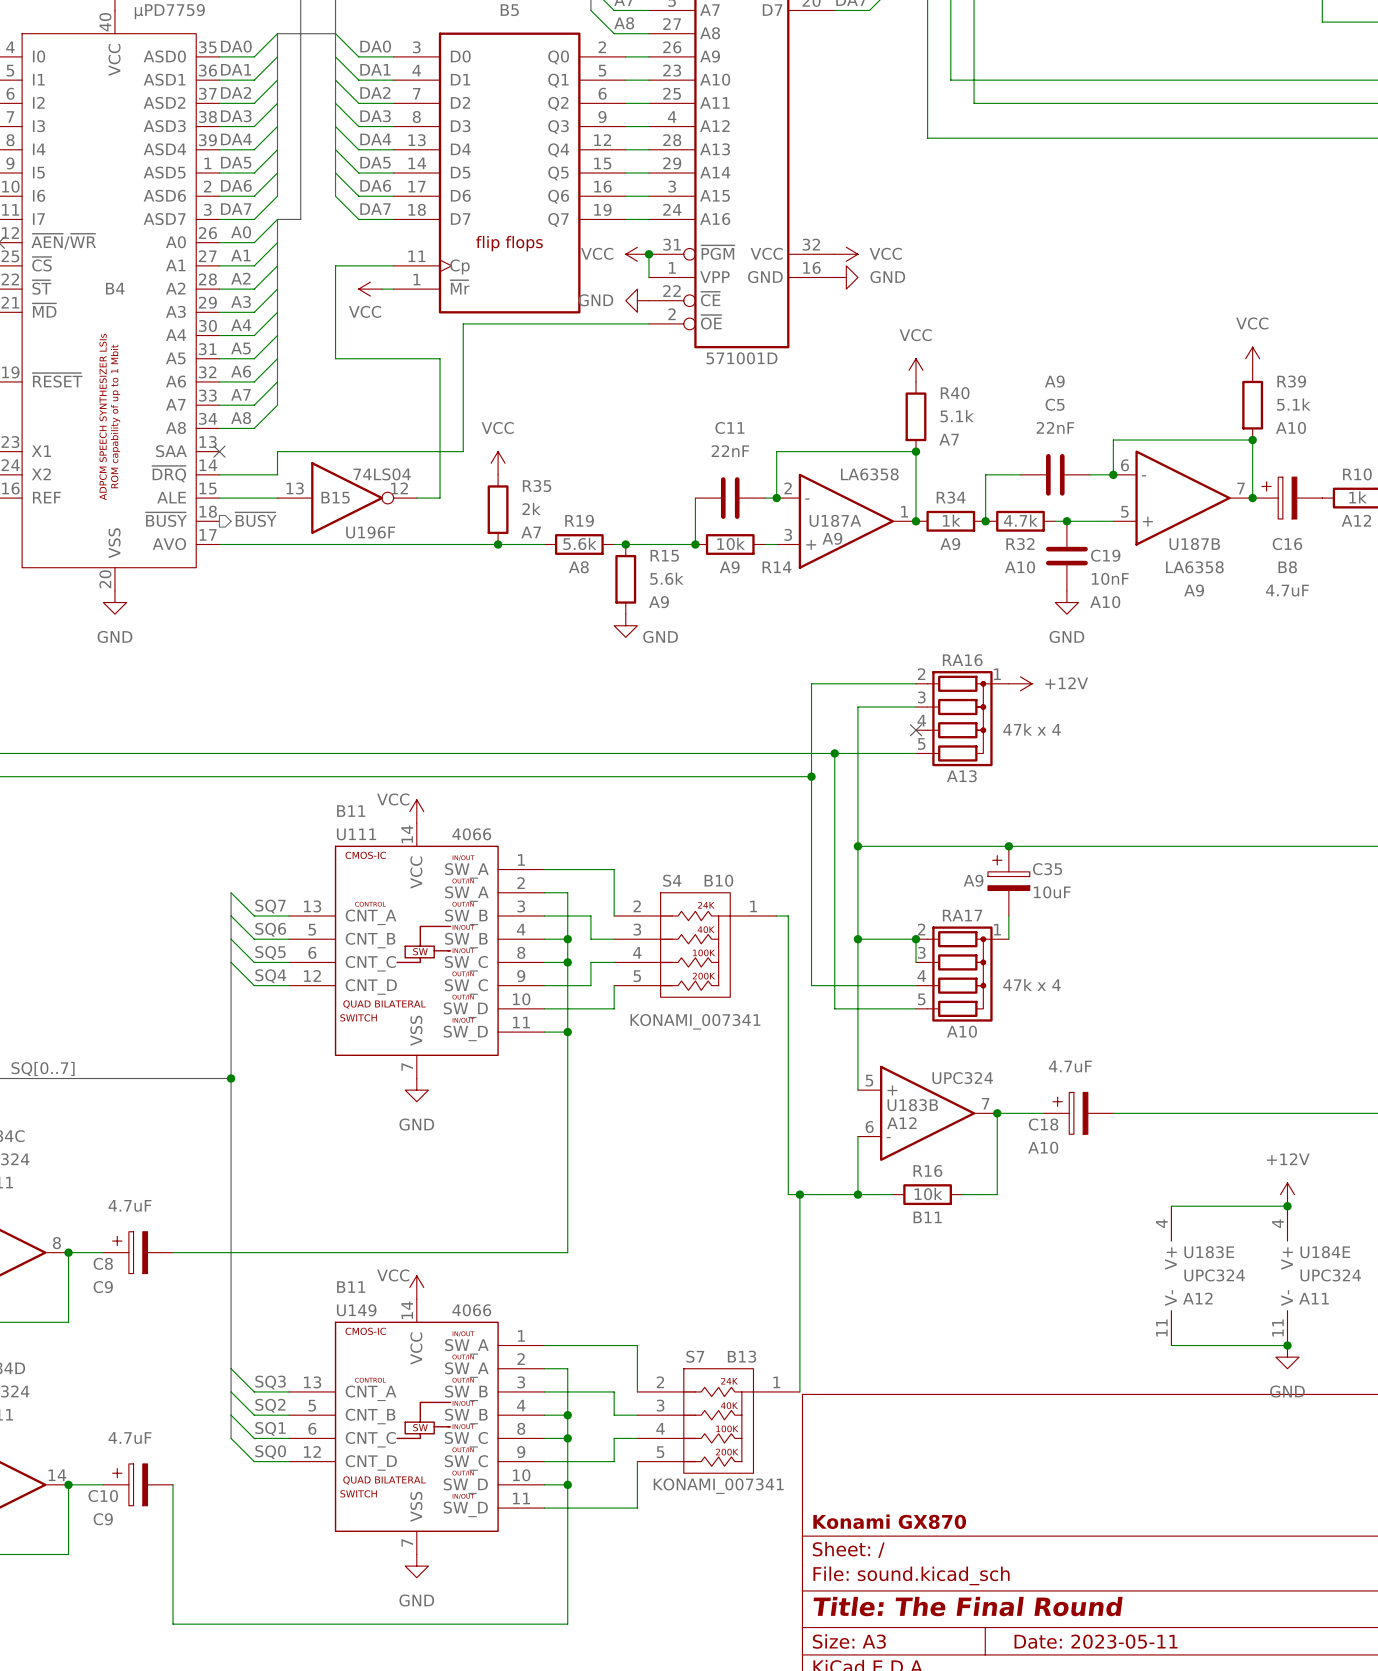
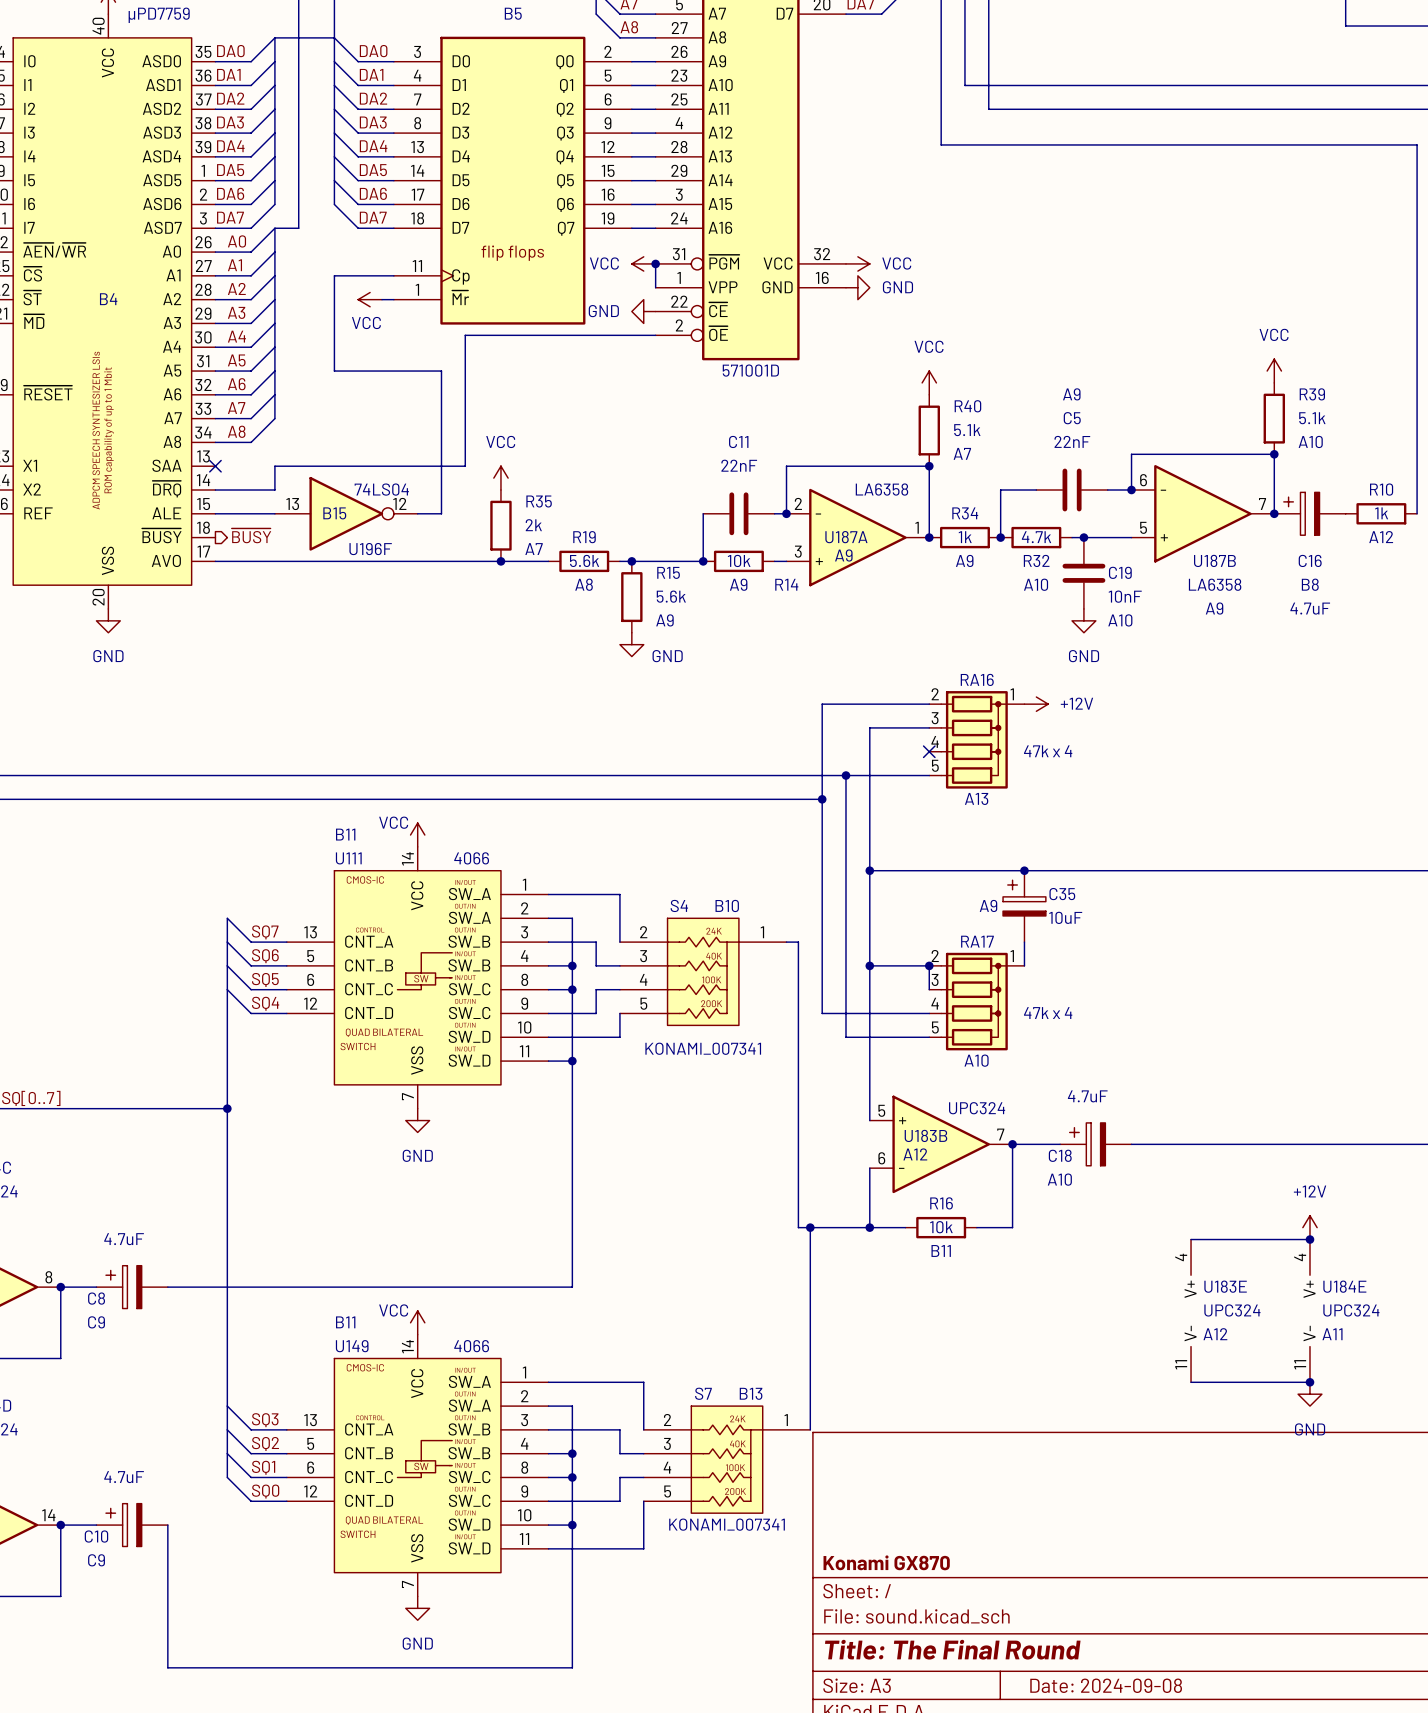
title block: Date: 2023-05-11 (1096, 1641) -> Date: 2024-09-08 (1106, 1685)

